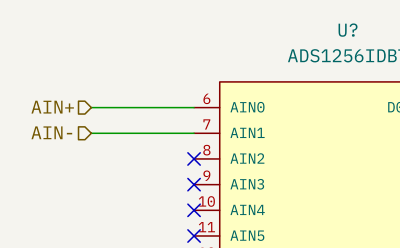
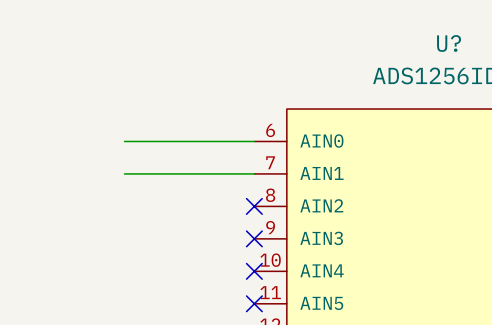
hierarchical label: AIN+ (52, 107) -> none
hierarchical label: AIN- (51, 132) -> none

